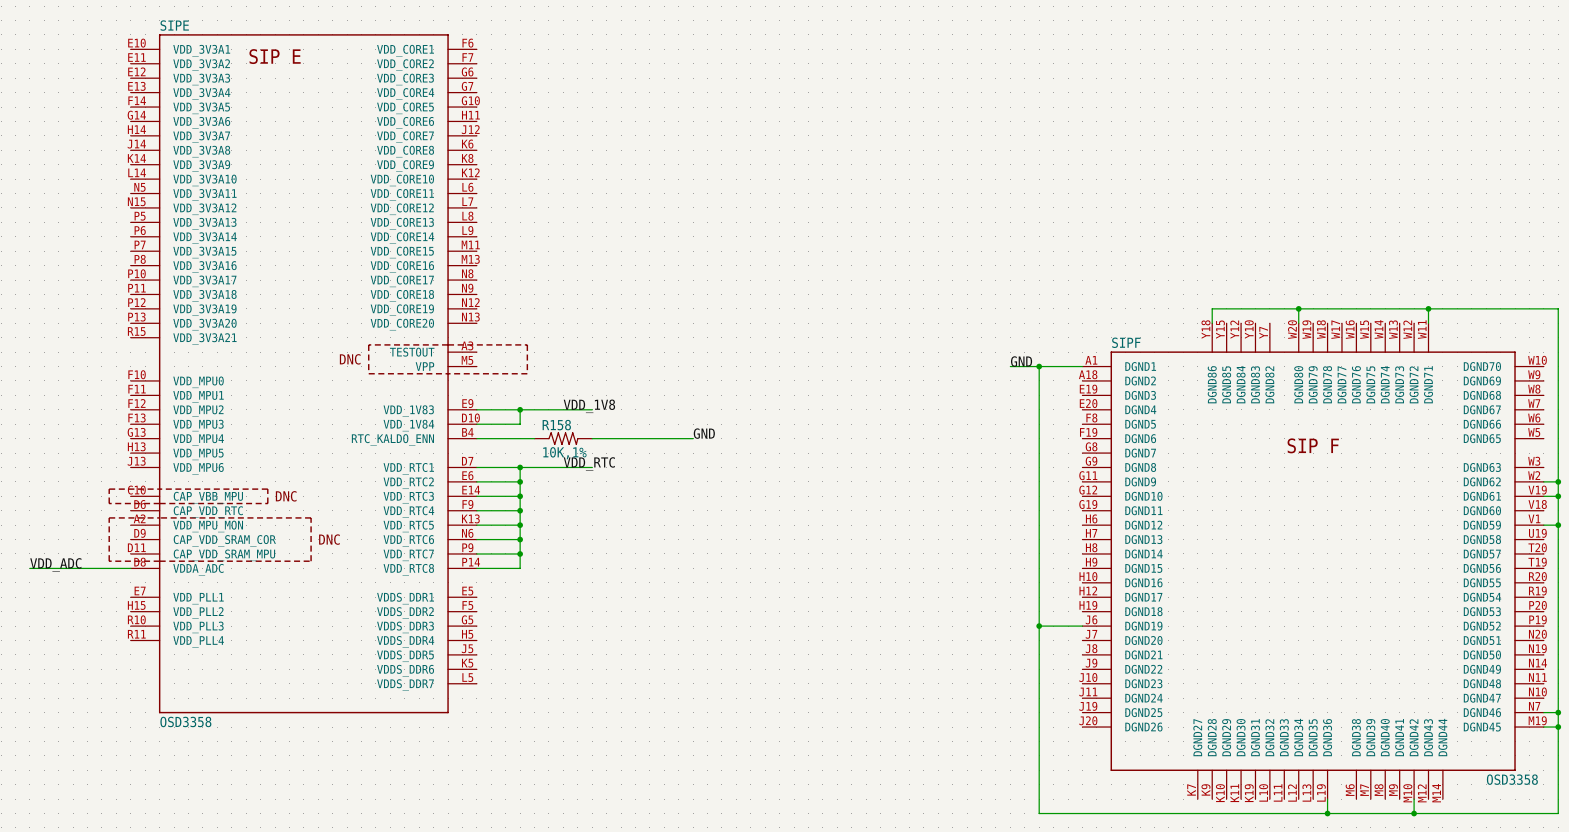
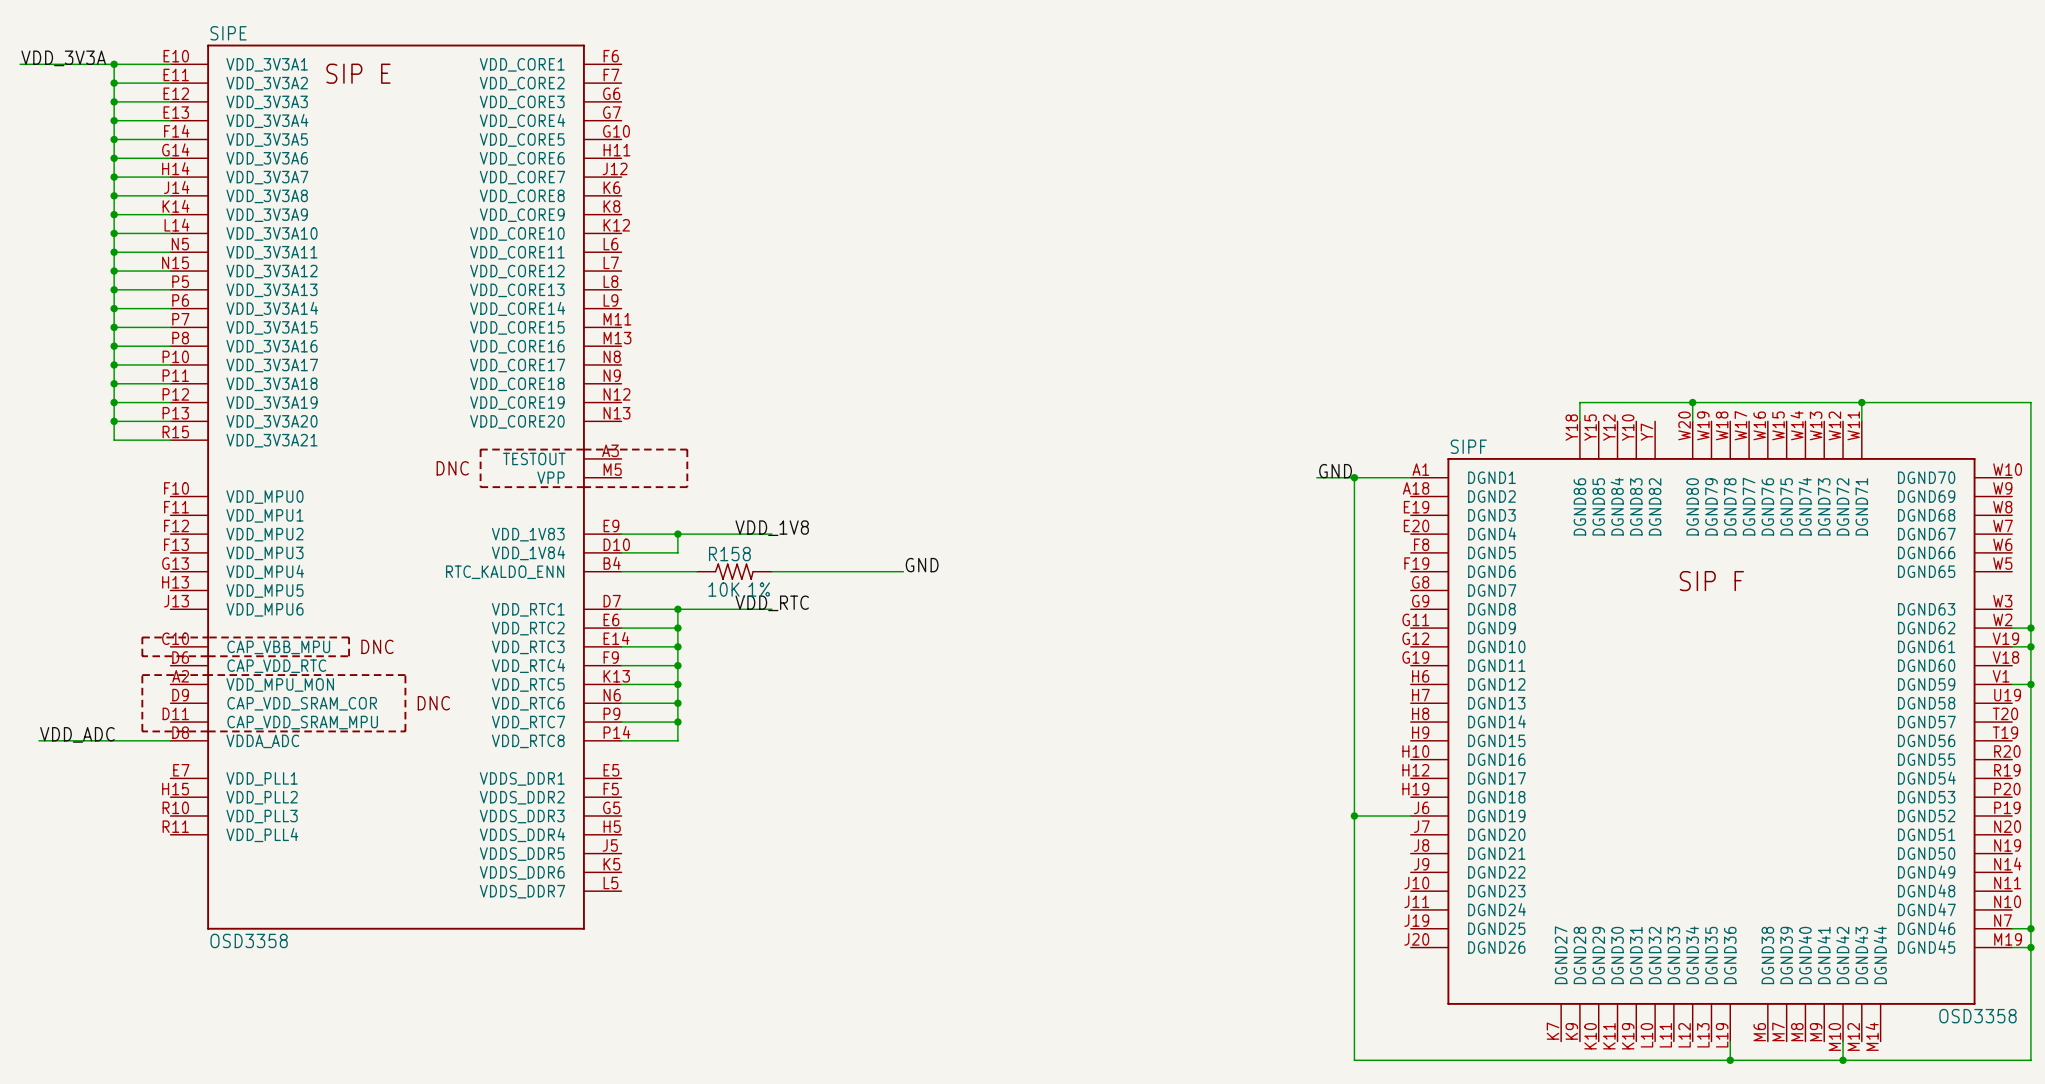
label: none -> VDD_3V3A (63, 58)
wire: none -> (20, 64) (170, 64)
wire: none -> (114, 64) (114, 440) (170, 440)
junction: none -> (114, 64)
wire: none -> (114, 83) (170, 83)
junction: none -> (114, 83)
wire: none -> (114, 101) (170, 101)
junction: none -> (114, 101)
wire: none -> (114, 120) (170, 120)
junction: none -> (114, 120)
wire: none -> (114, 139) (170, 139)
junction: none -> (114, 139)
wire: none -> (114, 158) (170, 158)
junction: none -> (114, 158)
wire: none -> (114, 177) (170, 177)
junction: none -> (114, 177)
wire: none -> (114, 195) (170, 195)
junction: none -> (114, 195)
wire: none -> (114, 214) (170, 214)
junction: none -> (114, 214)
wire: none -> (114, 233) (170, 233)
junction: none -> (114, 233)
wire: none -> (114, 252) (170, 252)
junction: none -> (114, 252)
wire: none -> (114, 271) (170, 271)
junction: none -> (114, 271)
wire: none -> (114, 289) (170, 289)
junction: none -> (114, 289)
wire: none -> (114, 308) (170, 308)
junction: none -> (114, 308)
wire: none -> (114, 327) (170, 327)
junction: none -> (114, 327)
wire: none -> (114, 346) (170, 346)
junction: none -> (114, 346)
wire: none -> (114, 364) (170, 364)
junction: none -> (114, 364)
wire: none -> (114, 383) (170, 383)
junction: none -> (114, 383)
wire: none -> (114, 402) (170, 402)
junction: none -> (114, 402)
wire: none -> (114, 421) (170, 421)
junction: none -> (114, 421)

